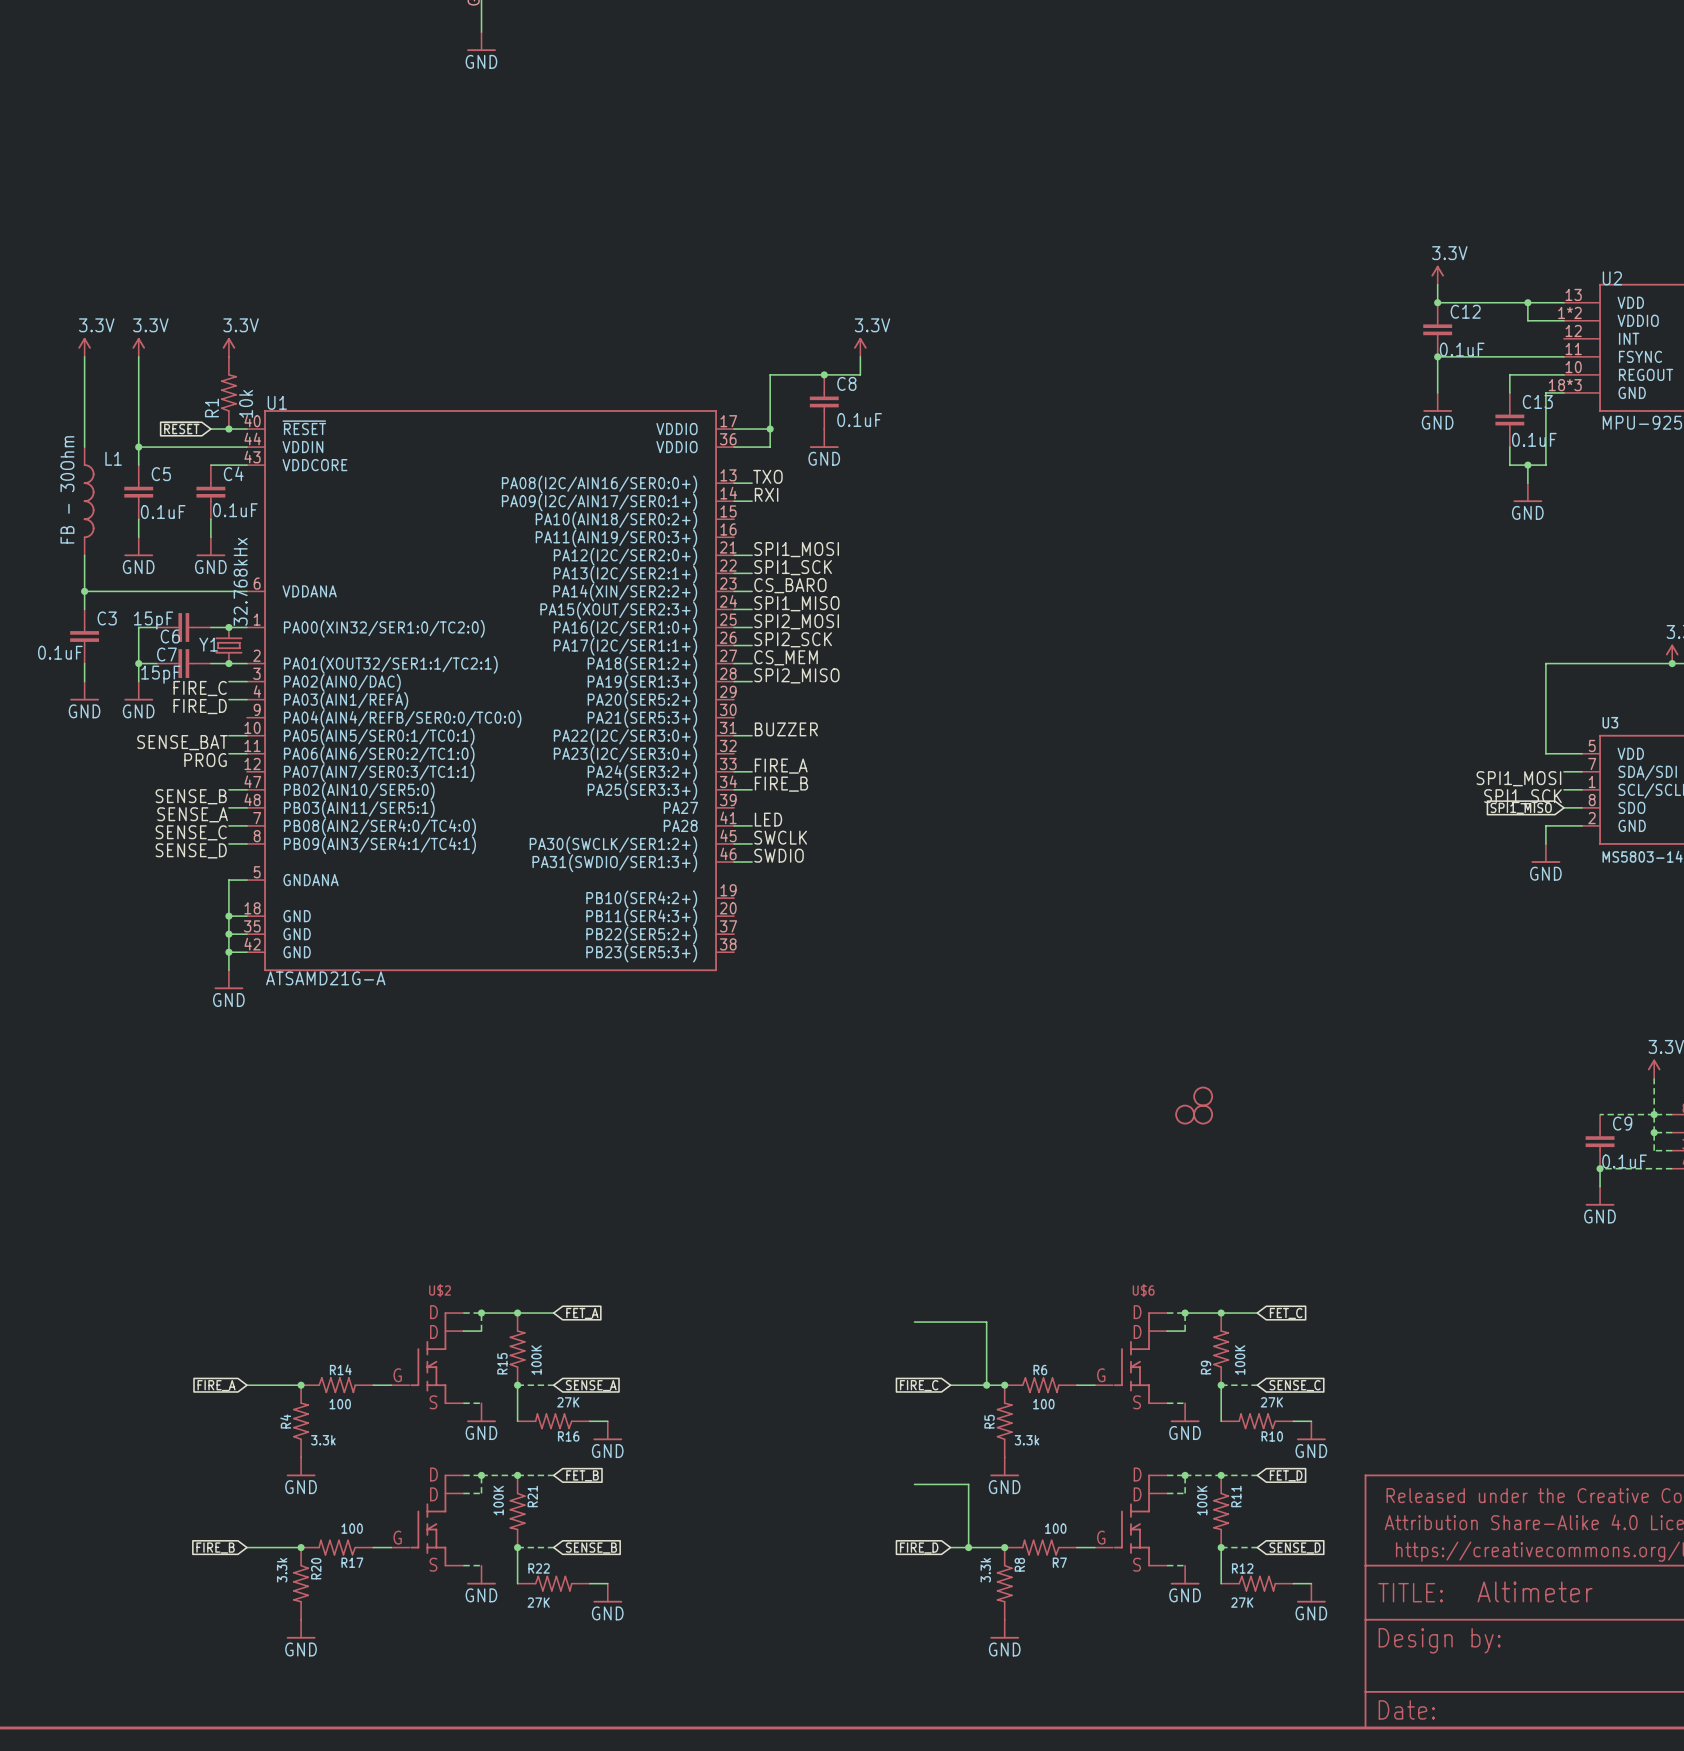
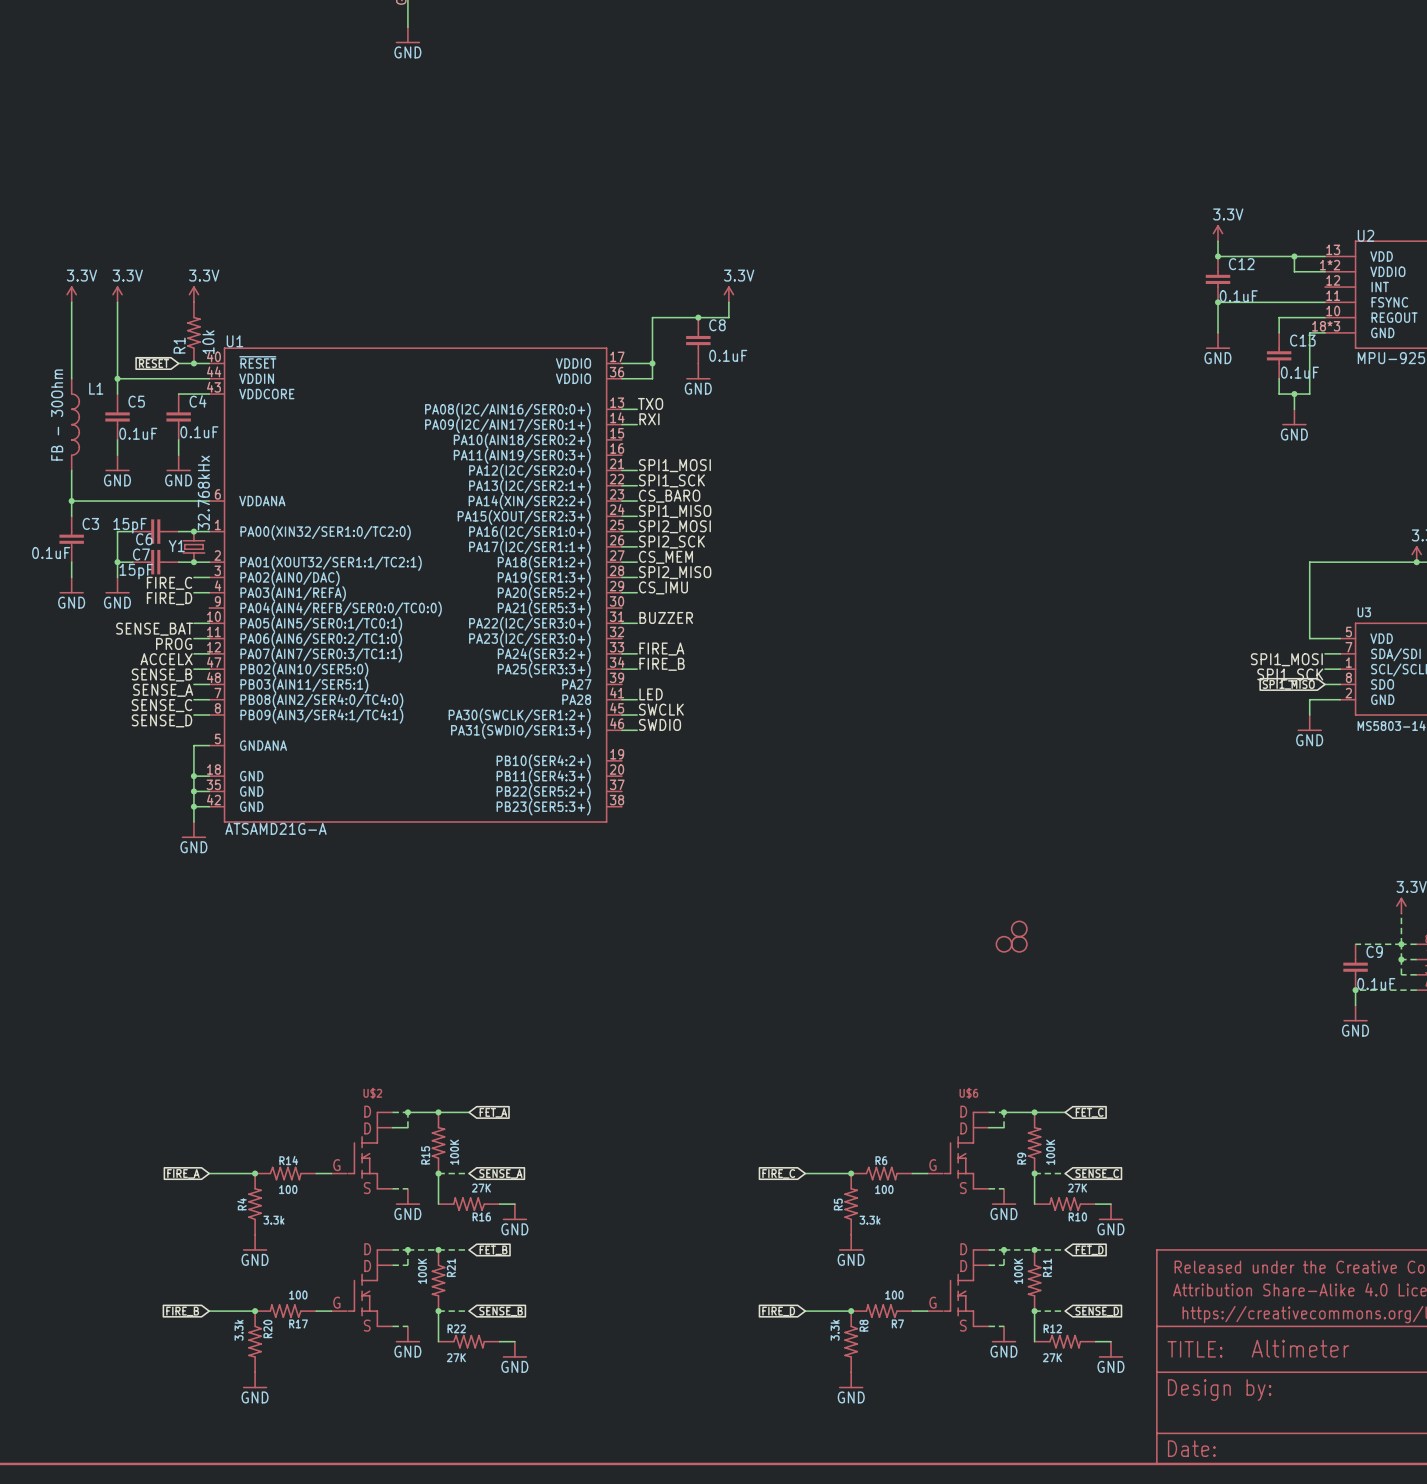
label: none -> CS_IMU (663, 587)
wire: none -> (621, 592) (637, 592)
wire: none -> (193, 653) (209, 653)
label: none -> ACCELX (166, 659)
wire: (914, 1322) (986, 1322) (986, 1385) -> none
junction: (986, 1385) -> none
wire: (914, 1484) (968, 1484) (968, 1547) -> none
junction: (968, 1547) -> none

